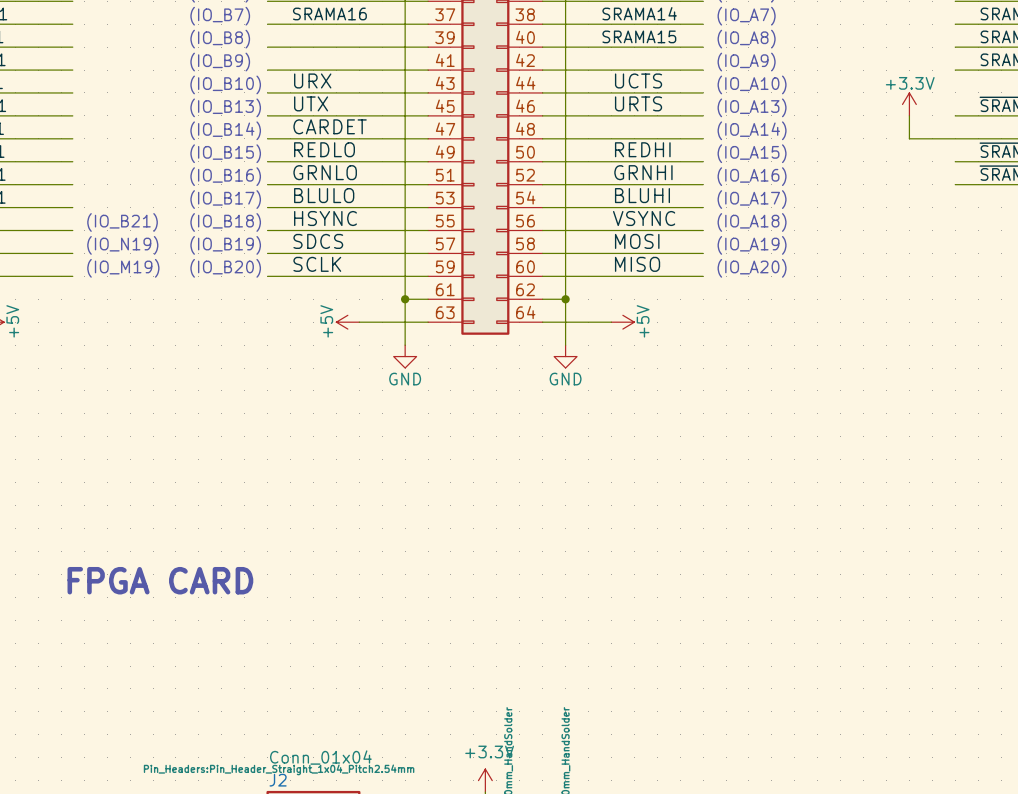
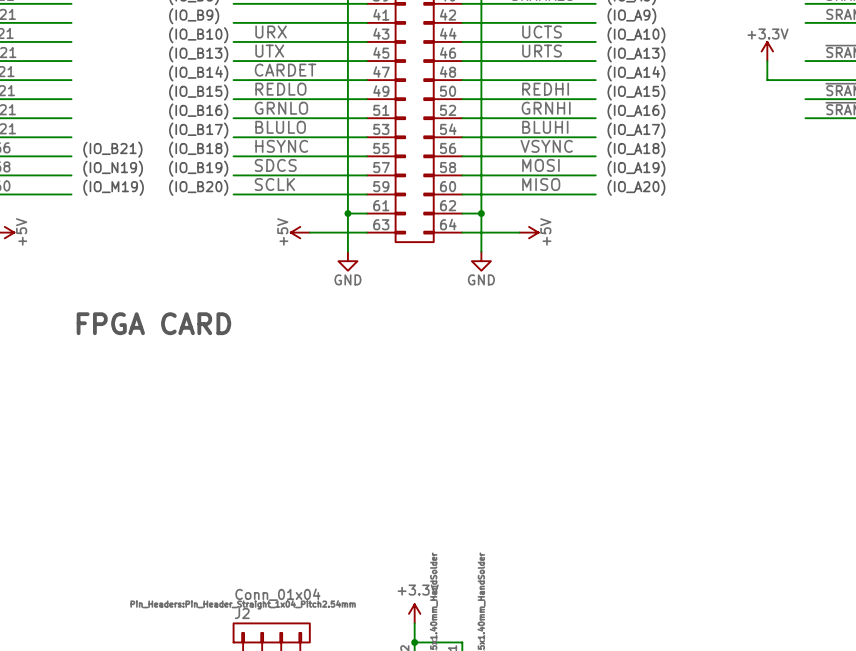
text position: FPGA CARD (160, 580) -> FPGA CARD (153, 323)

